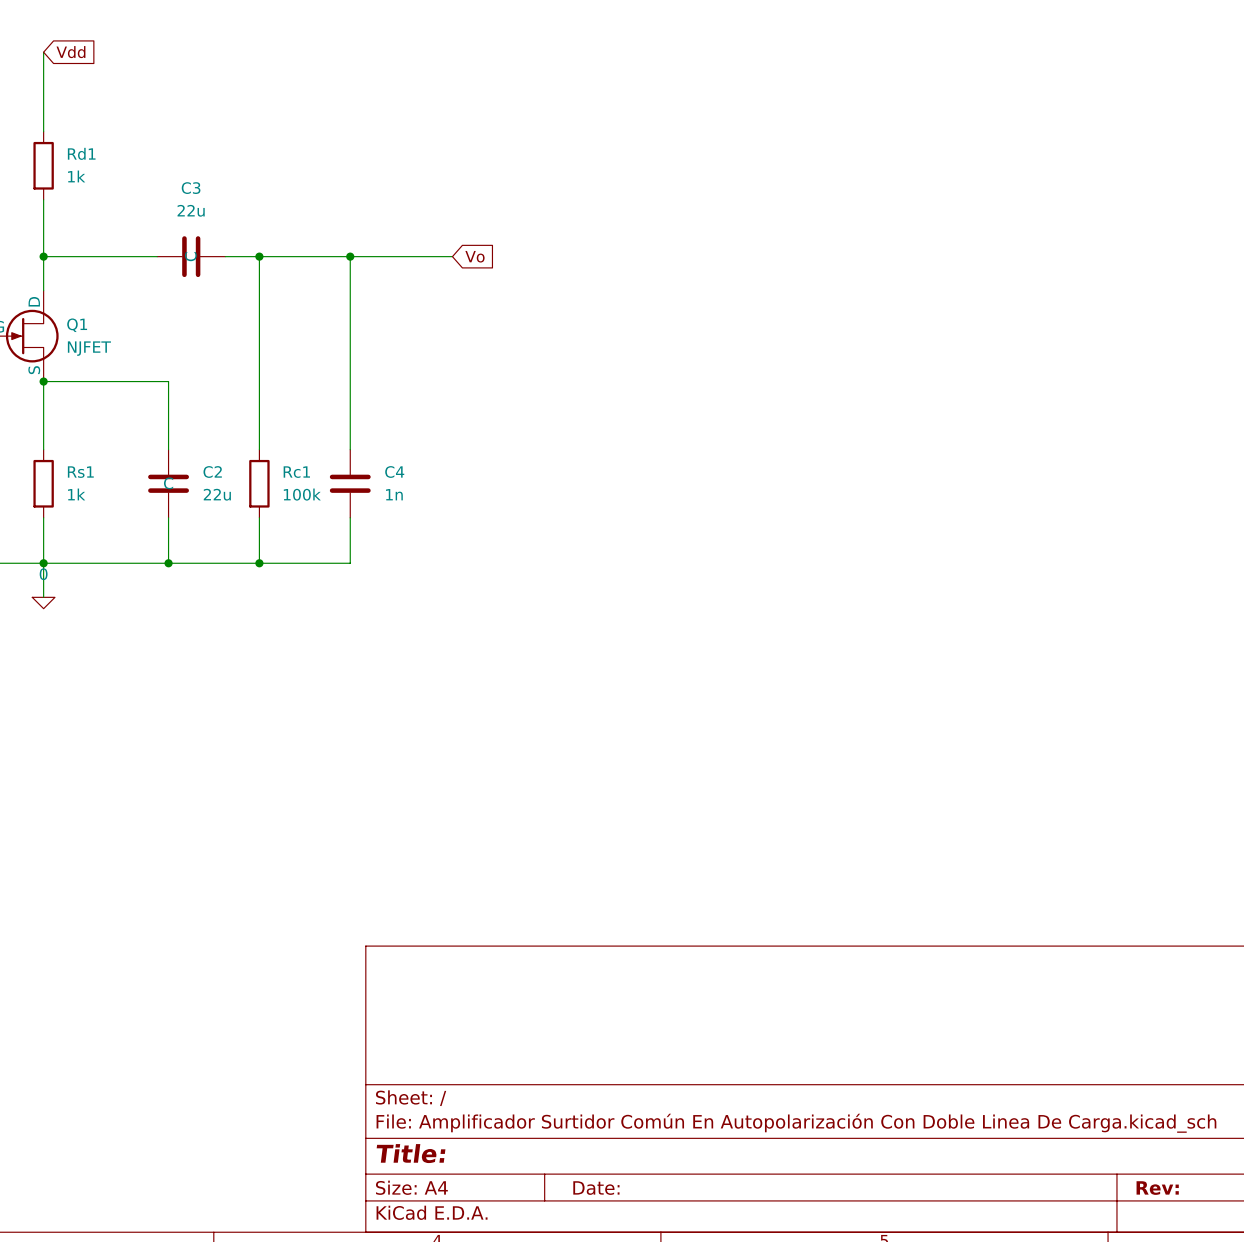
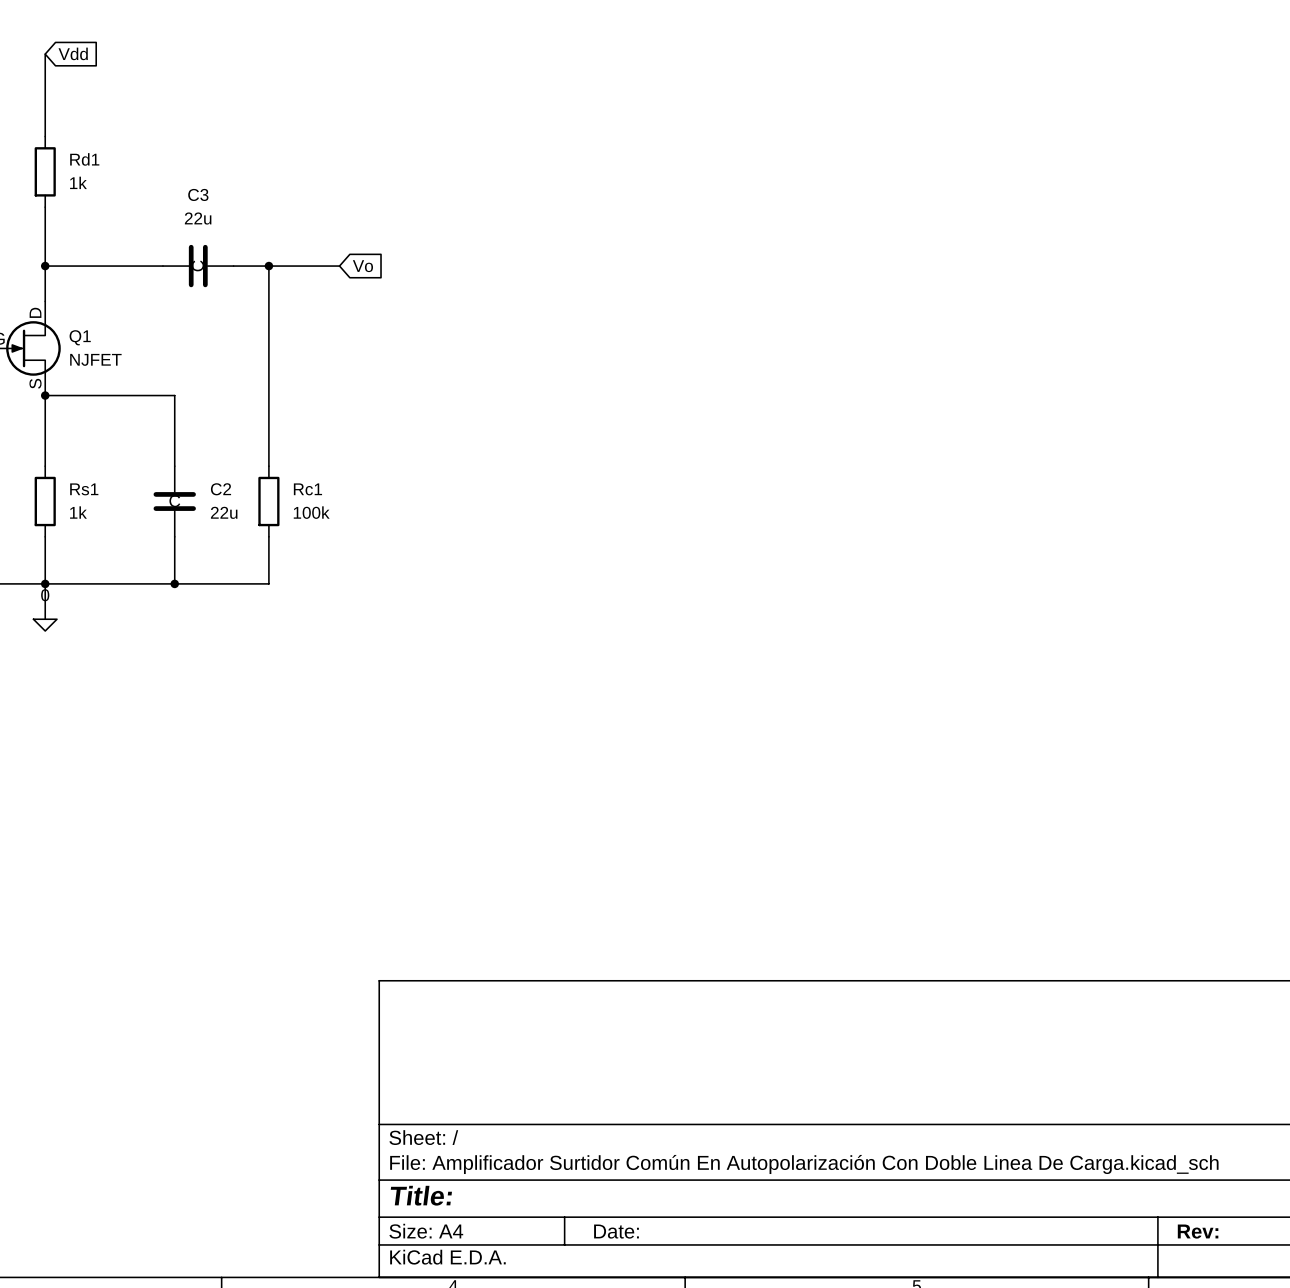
wire: (327, 256) (452, 256) -> none
wire: (350, 256) (350, 449) -> none
junction: (350, 256) -> none
global label position: Vo (474, 256) -> Vo (362, 266)
C4: 1n (350, 483) -> none
wire: (350, 517) (350, 563) (259, 563) -> none
junction: (259, 563) -> none

